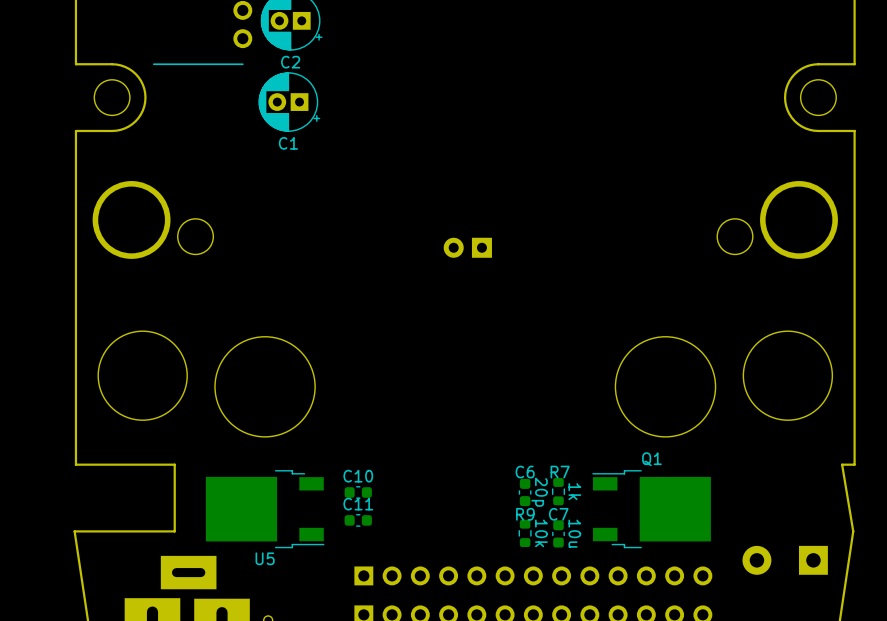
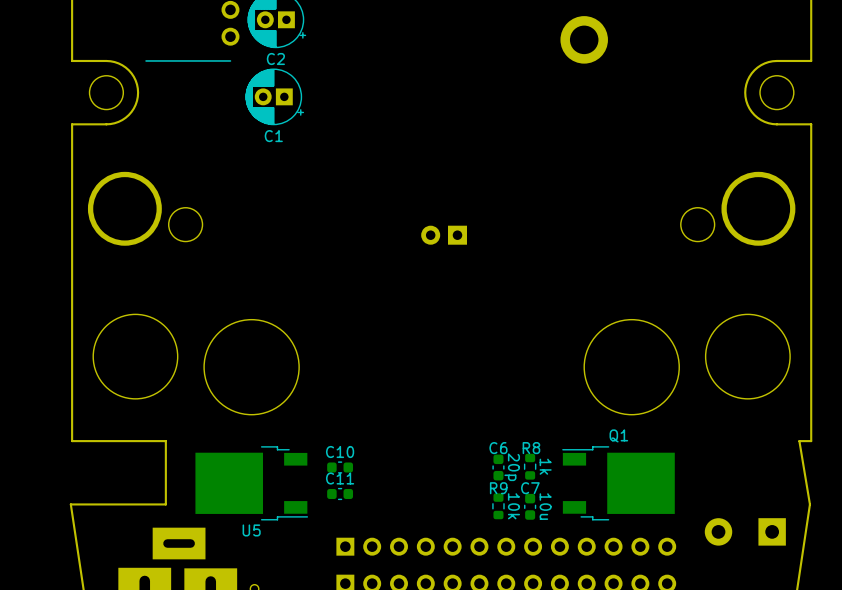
part: none -> (584, 39)
R7 name: R7 (560, 472) -> R8 (531, 448)

